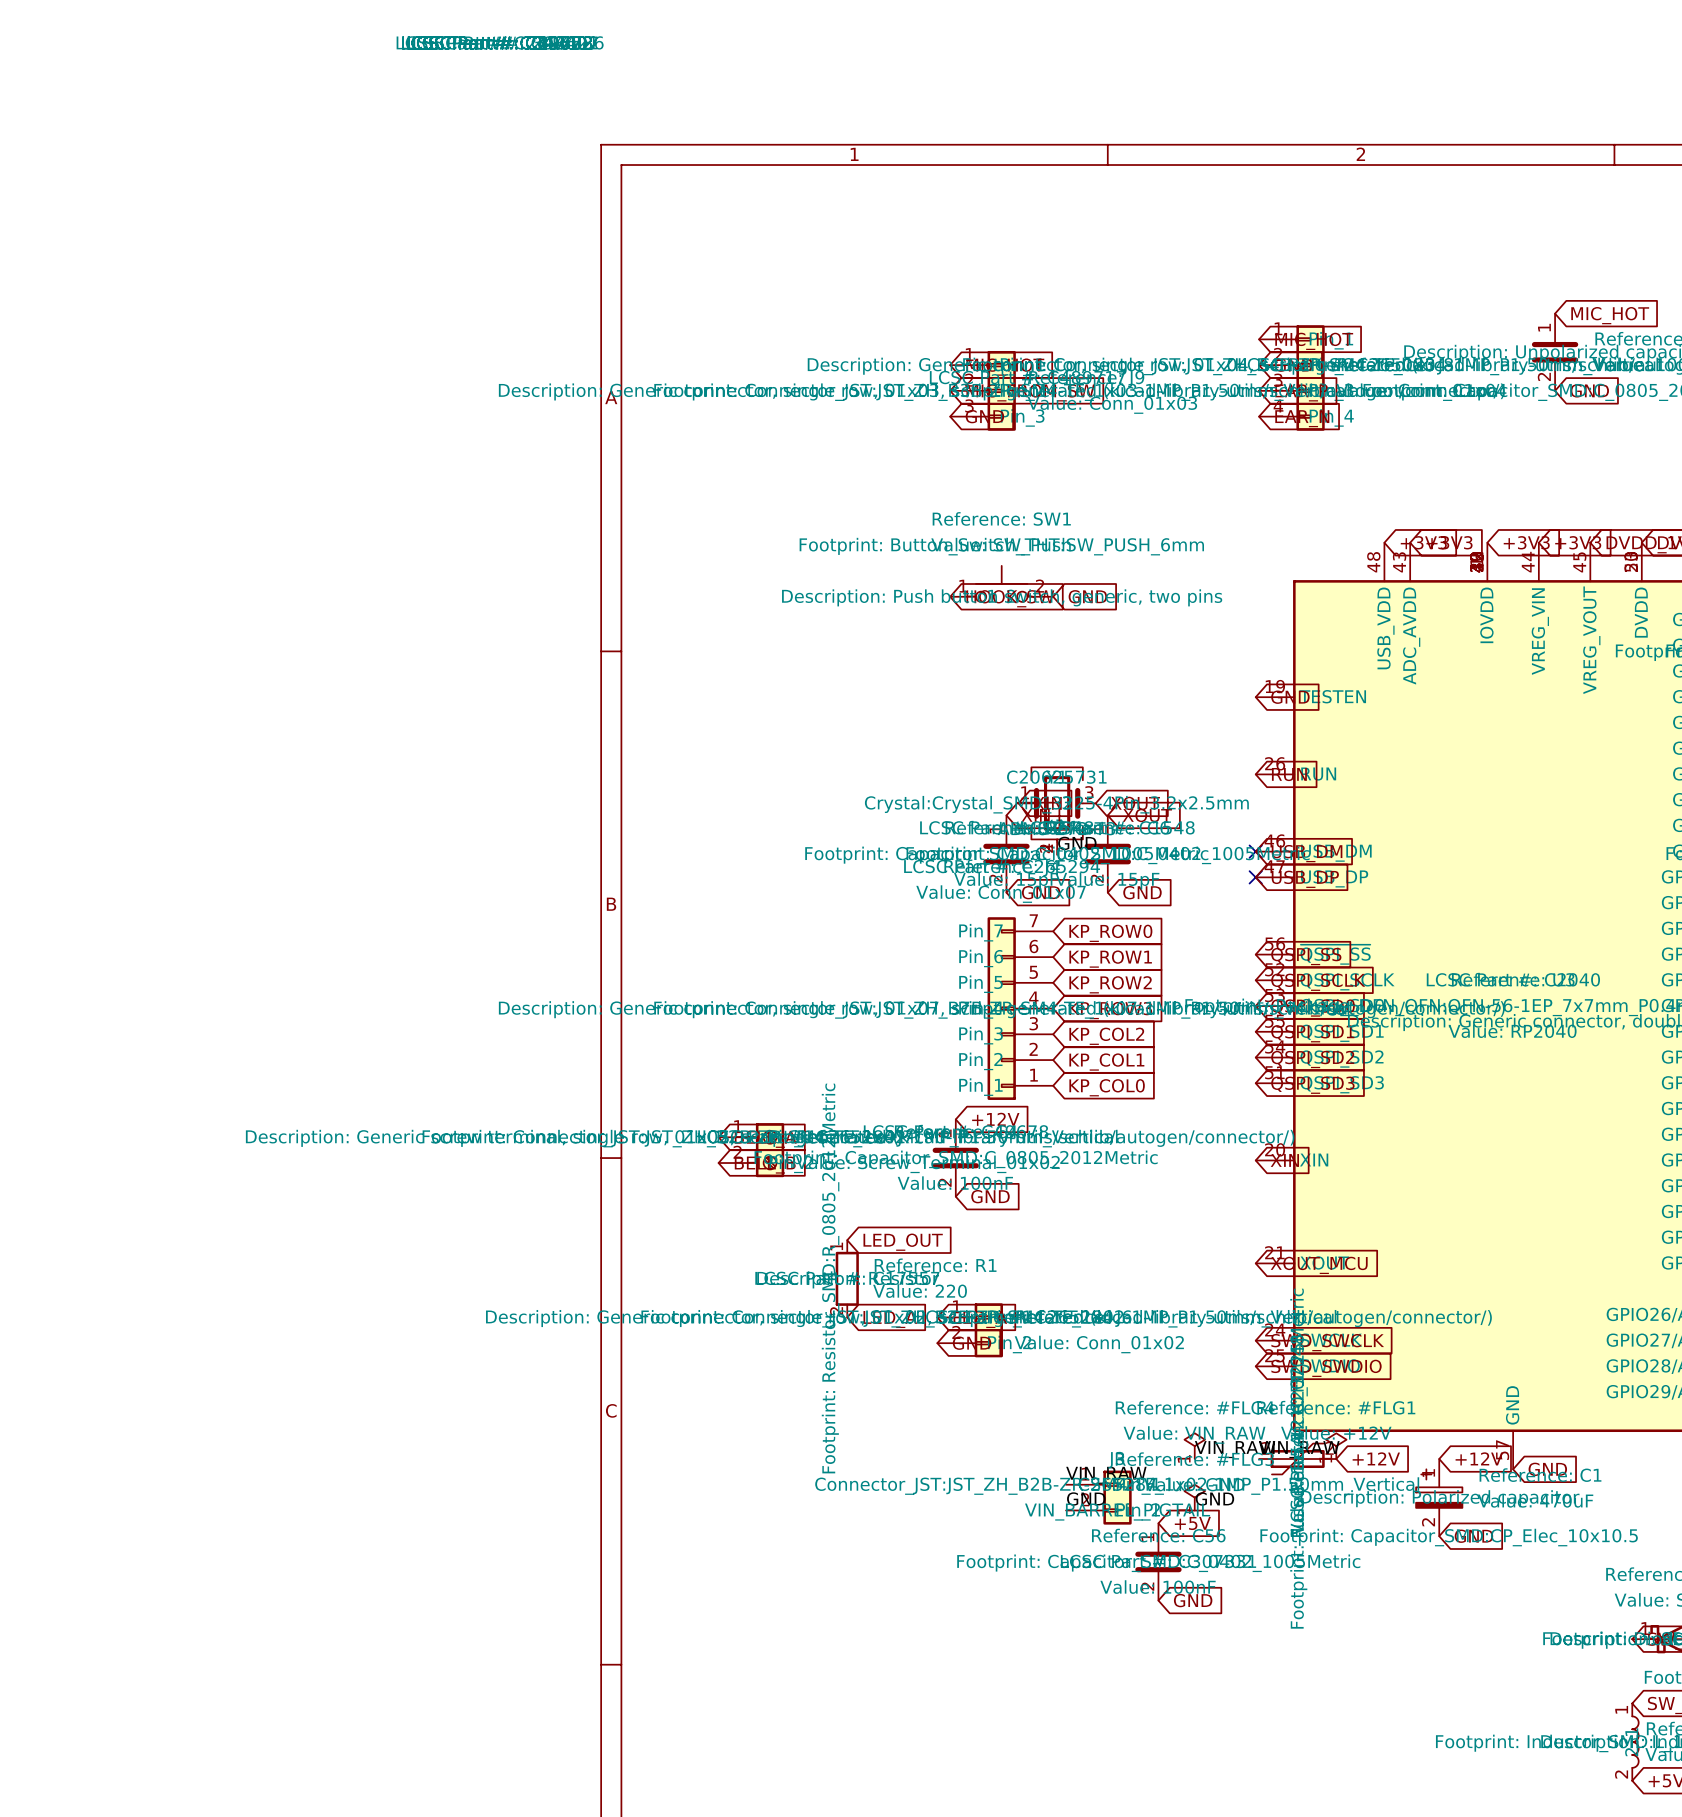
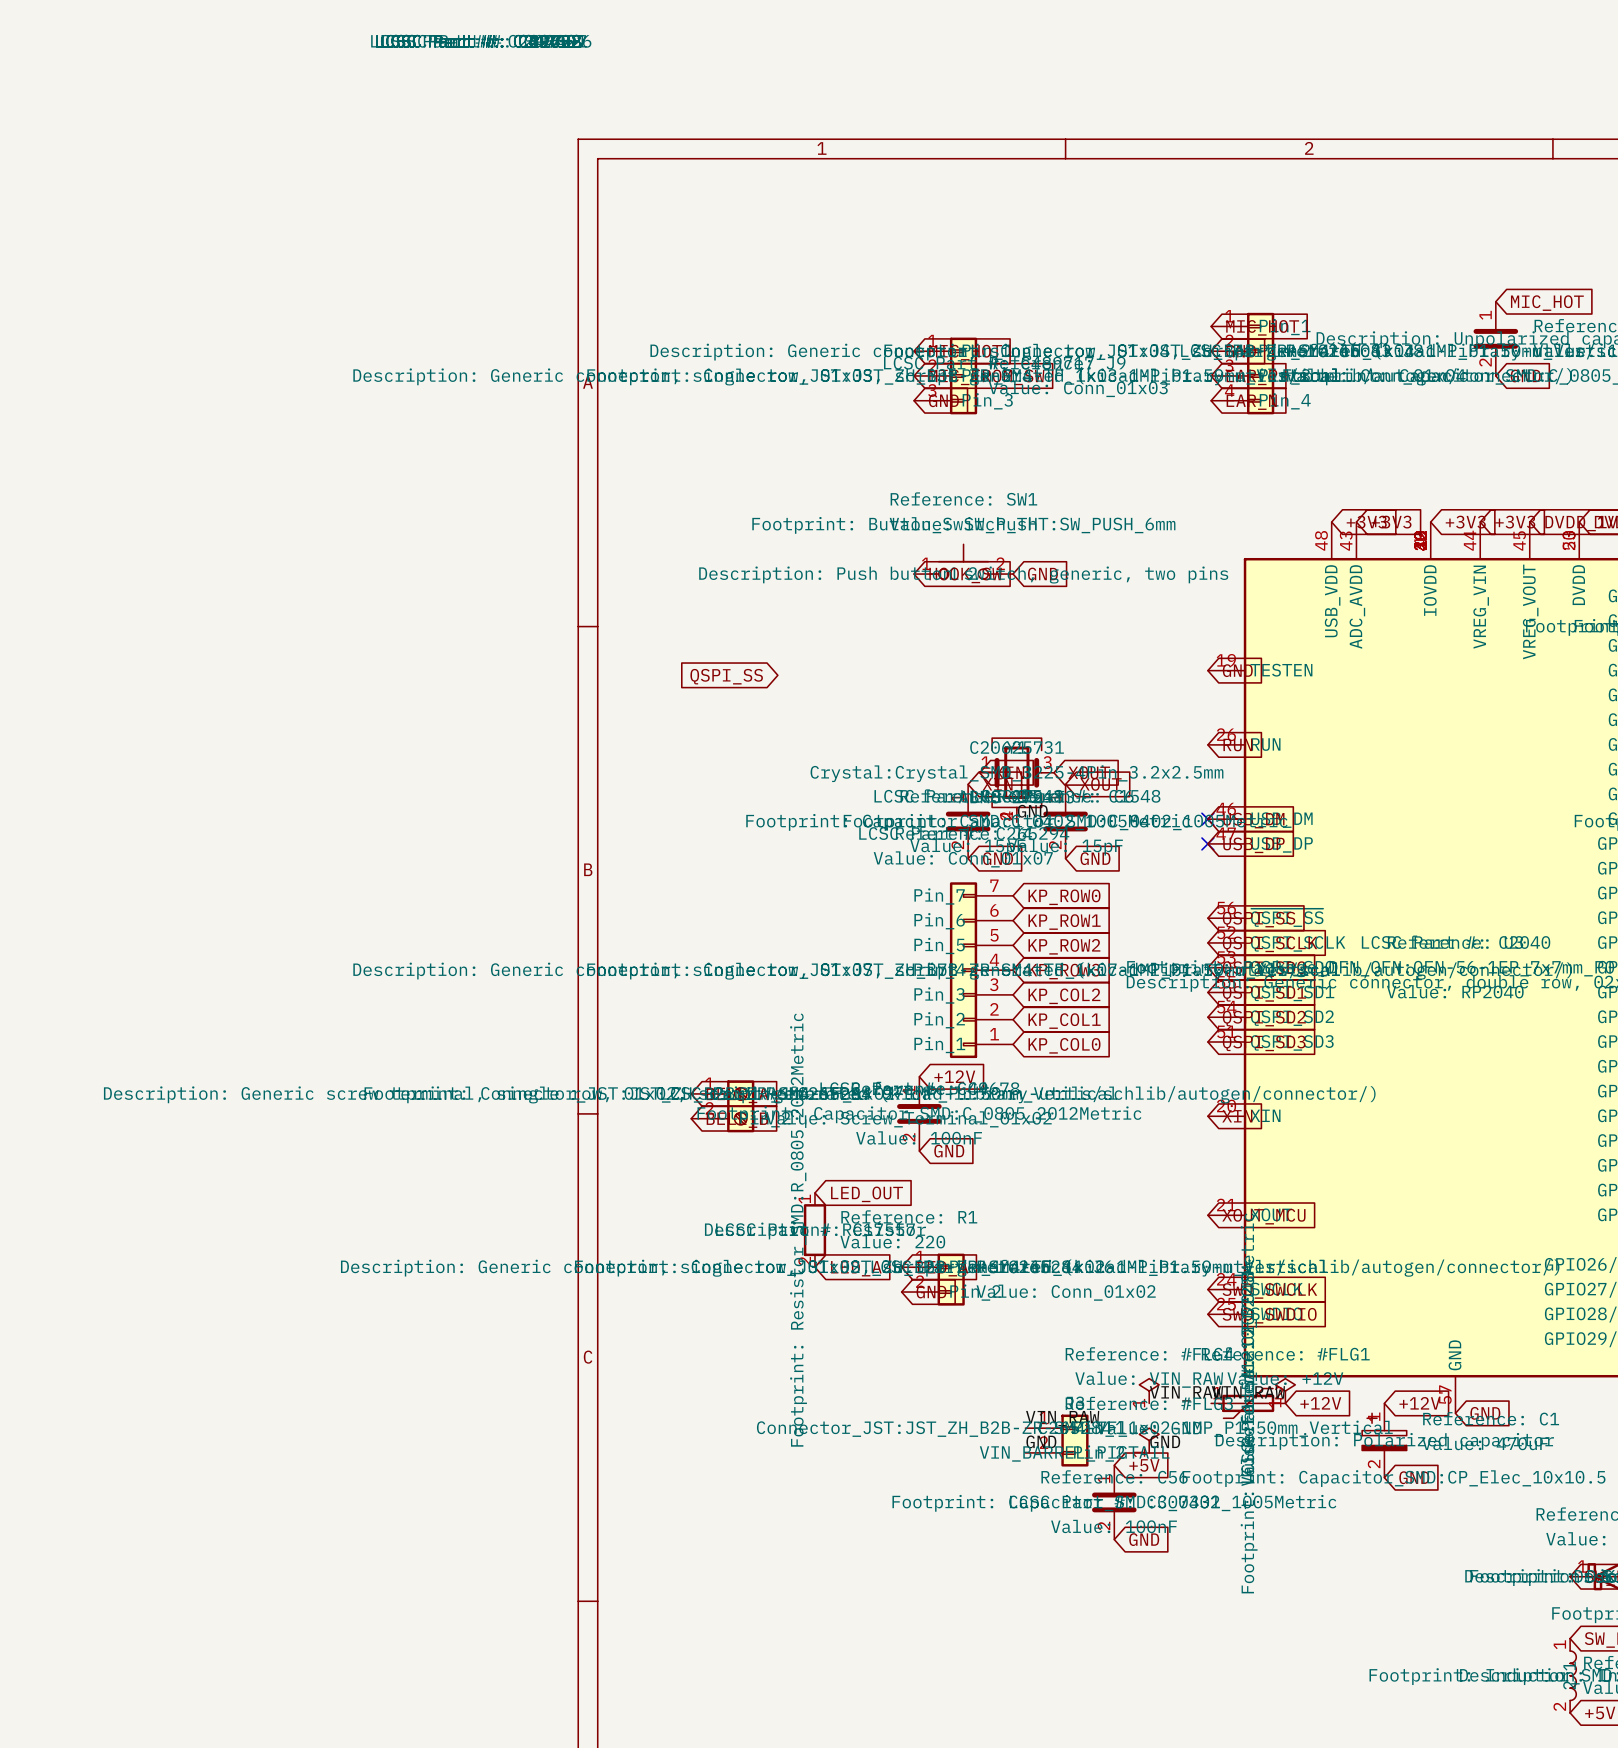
global label: none -> QSPI_SS (726, 676)

